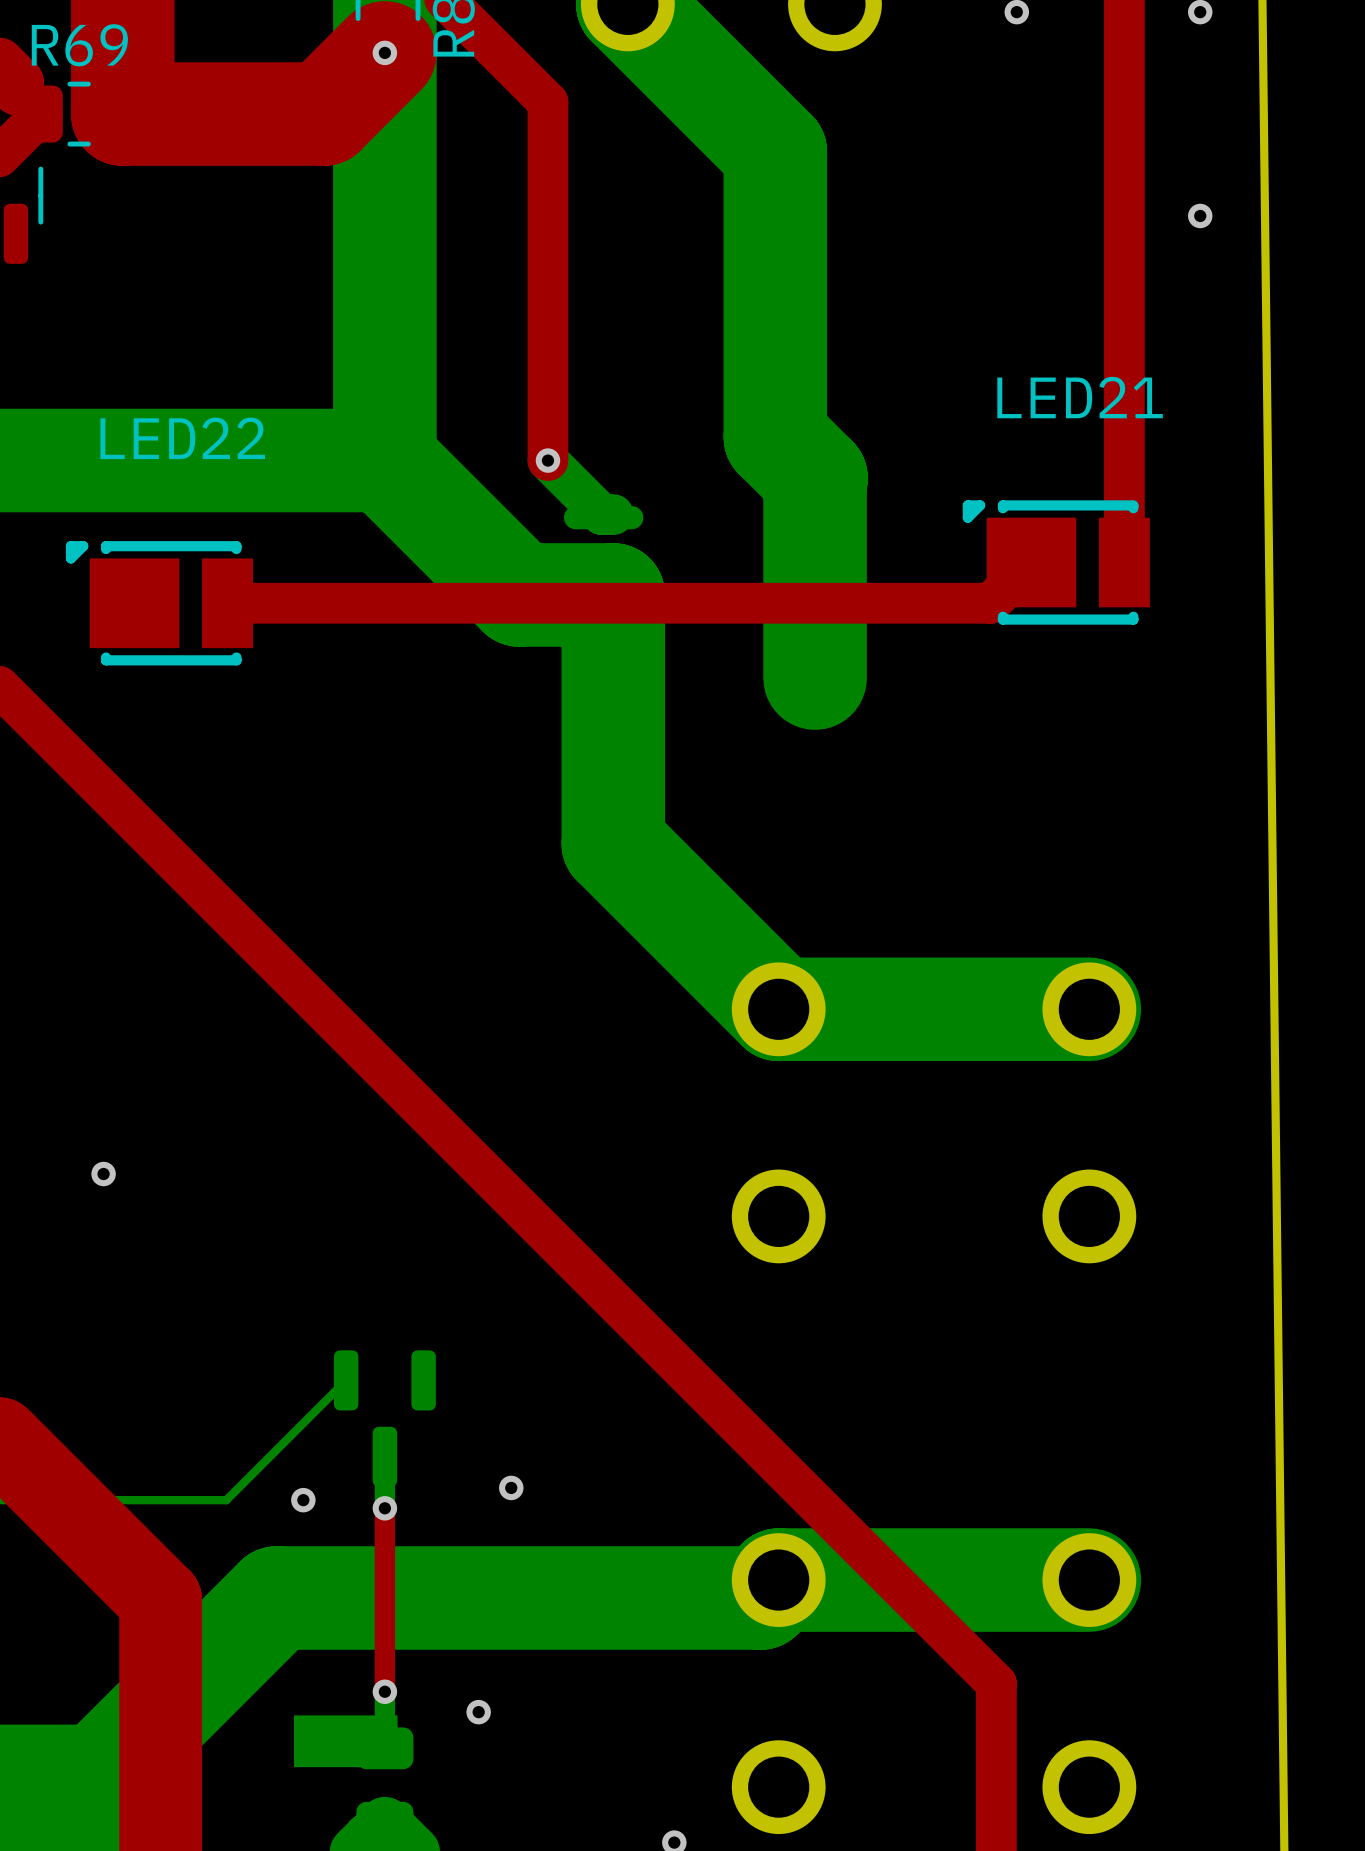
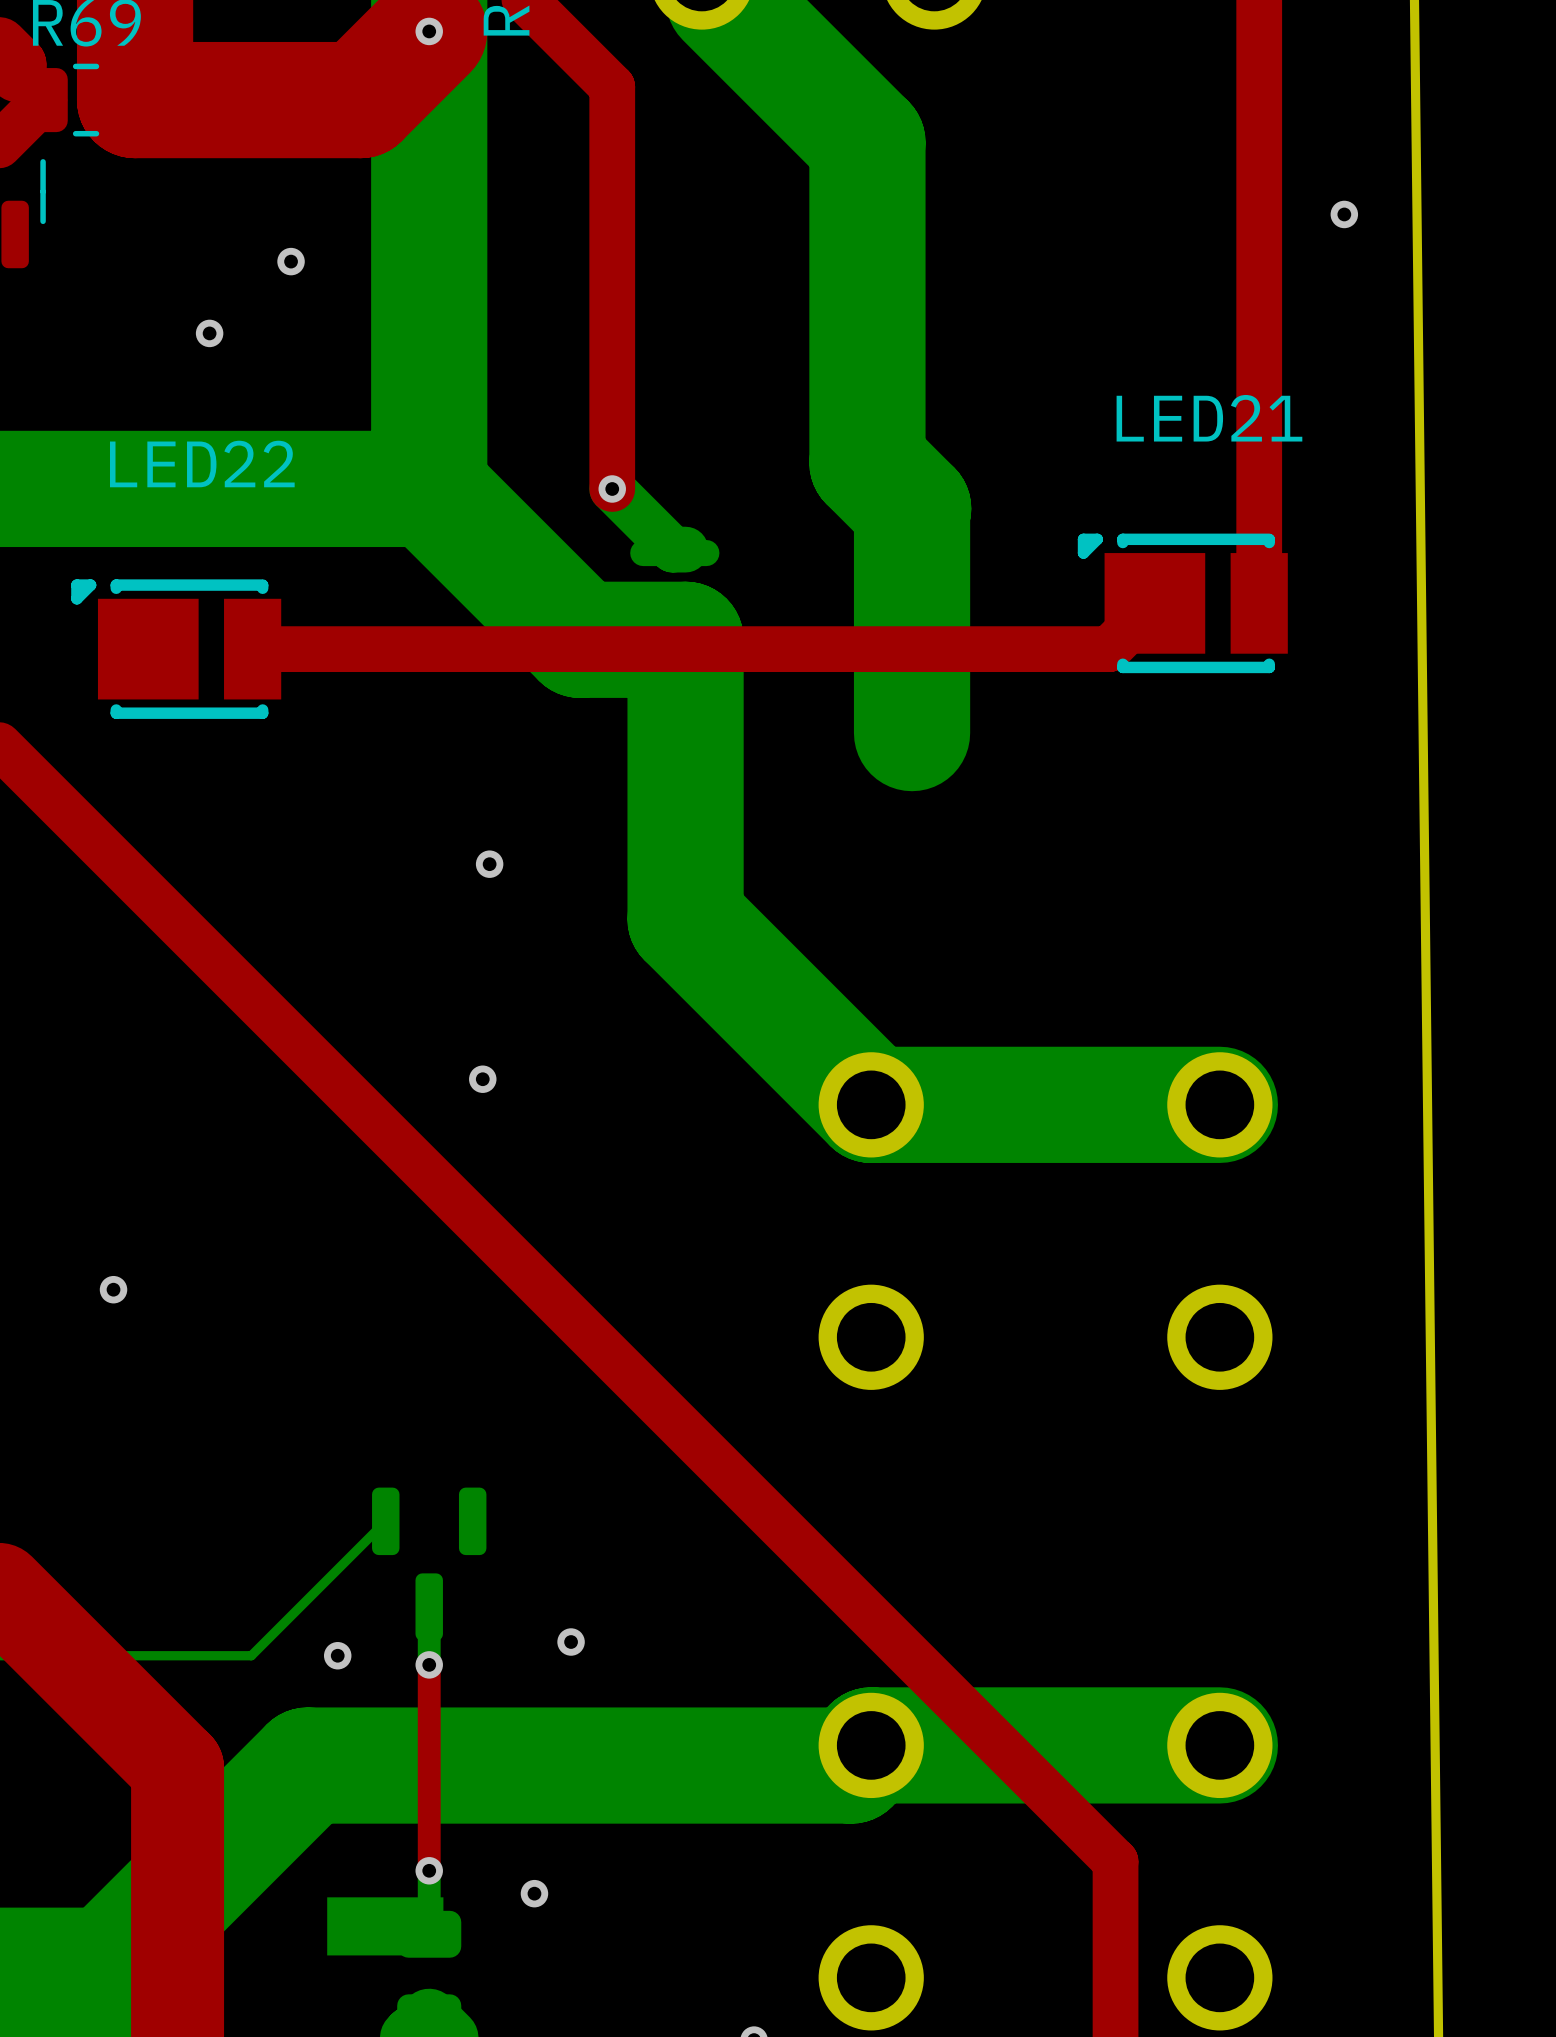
via: none -> (291, 261)
via: none -> (209, 333)
via: none -> (489, 864)
via: none -> (482, 1079)

